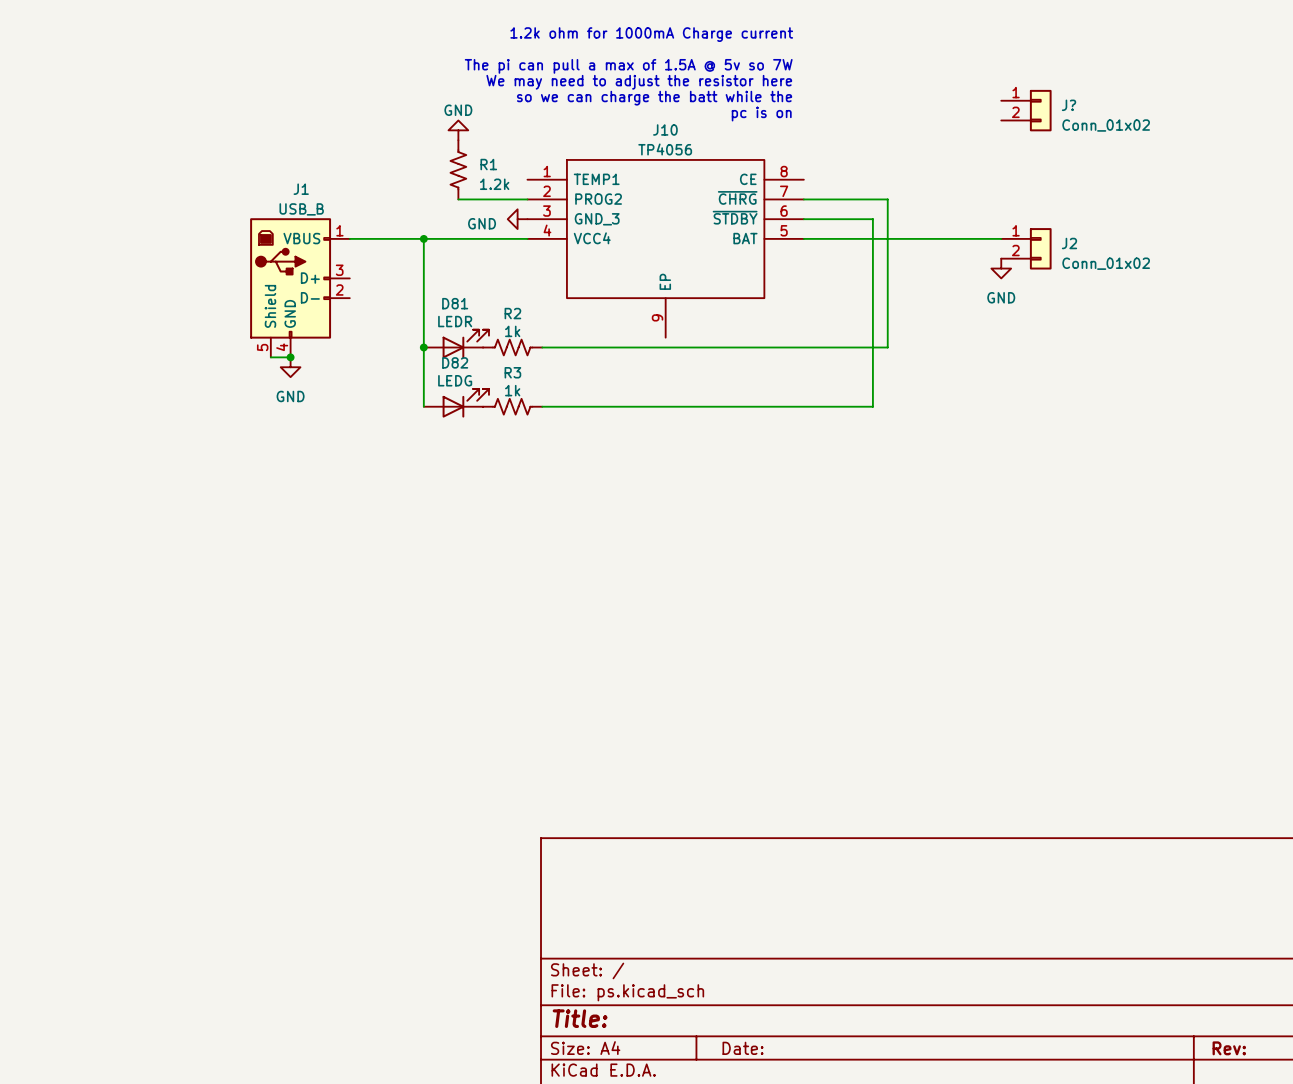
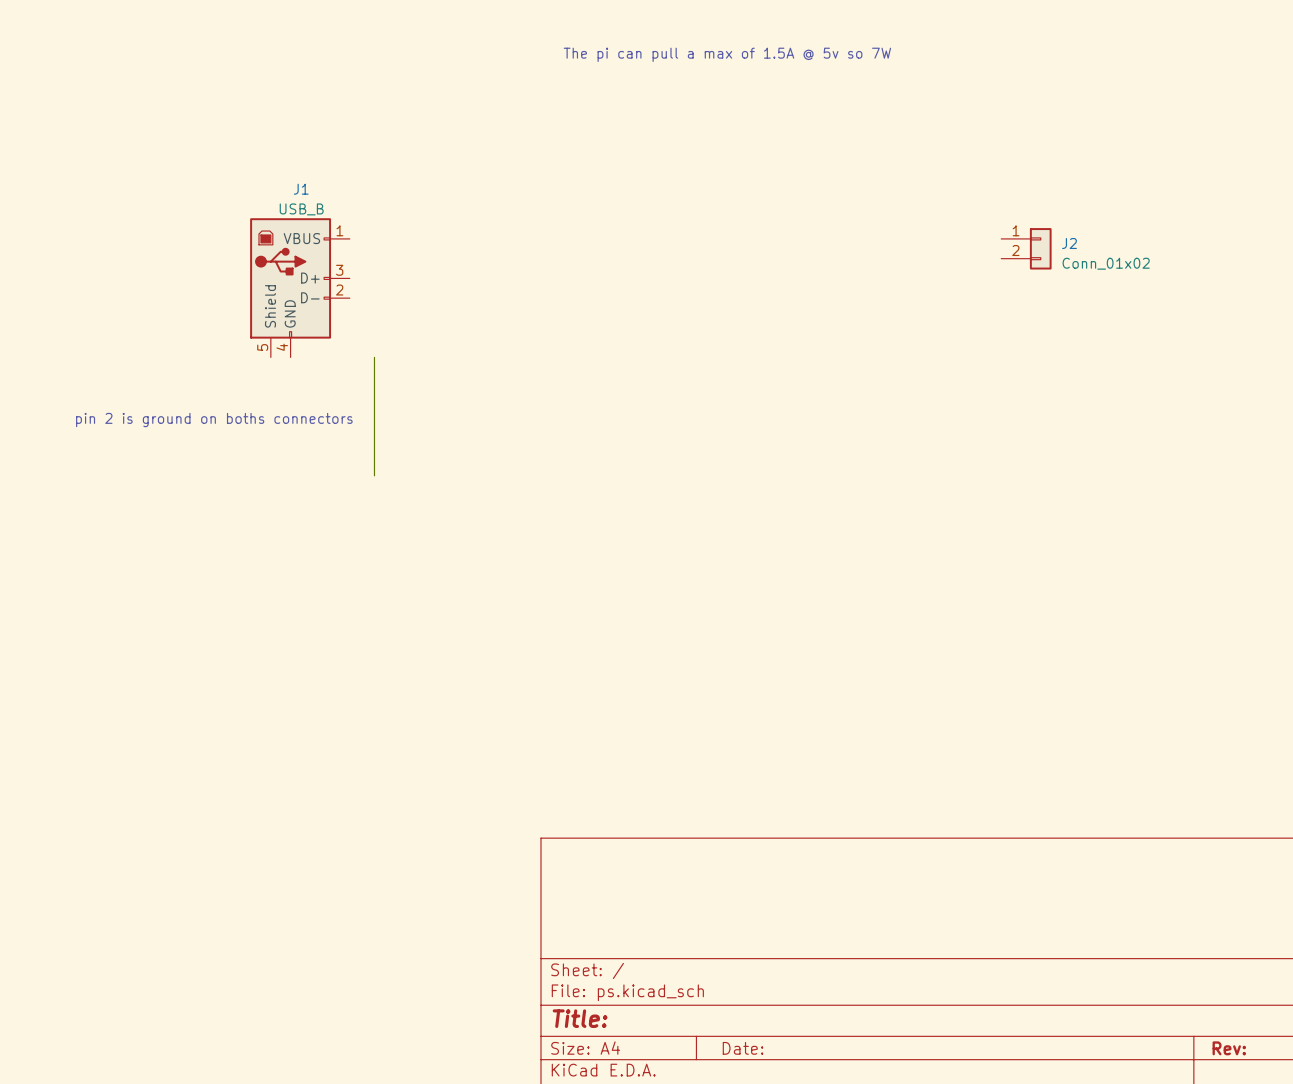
text: 1.2k ohm for 1000mA Charge current (651, 34) -> none
text position: The pi can pull a max of 1.5A @ 5v so 7W (628, 66) -> The pi can pull a max of 1.5A @ 5v so 7W (727, 54)
text: We may need to adjust the resistor here (639, 82) -> none
text: so we can charge the batt while the (654, 98) -> none
J?: Conn_01x02 (1026, 110) -> none
text: pc is on (761, 114) -> none
power symbol: GND (458, 130) -> none
R1: 1.2k (458, 169) -> none
wire: (458, 199) (527, 199) -> none
wire: (803, 199) (887, 199) (887, 347) (542, 347) -> none
power symbol: GND (517, 219) -> none
wire: (803, 219) (872, 219) (872, 406) (542, 406) -> none
wire: (349, 238) (527, 238) -> none
wire: (423, 238) (423, 406) -> none
junction: (423, 238) -> none
wire: (803, 238) (1001, 238) -> none
J10: TP4056 (665, 248) -> none
power symbol: GND (1001, 268) -> none
D81: LEDR (456, 344) -> none
junction: (423, 347) -> none
R2: 1k (512, 347) -> none
wire: (270, 357) (290, 357) -> none
junction: (290, 357) -> none
wire: none -> (374, 357) (374, 475)
power symbol: GND (290, 367) -> none
D82: LEDG (456, 403) -> none
R3: 1k (512, 406) -> none
text: none -> pin 2 is ground on boths connectors (214, 420)

